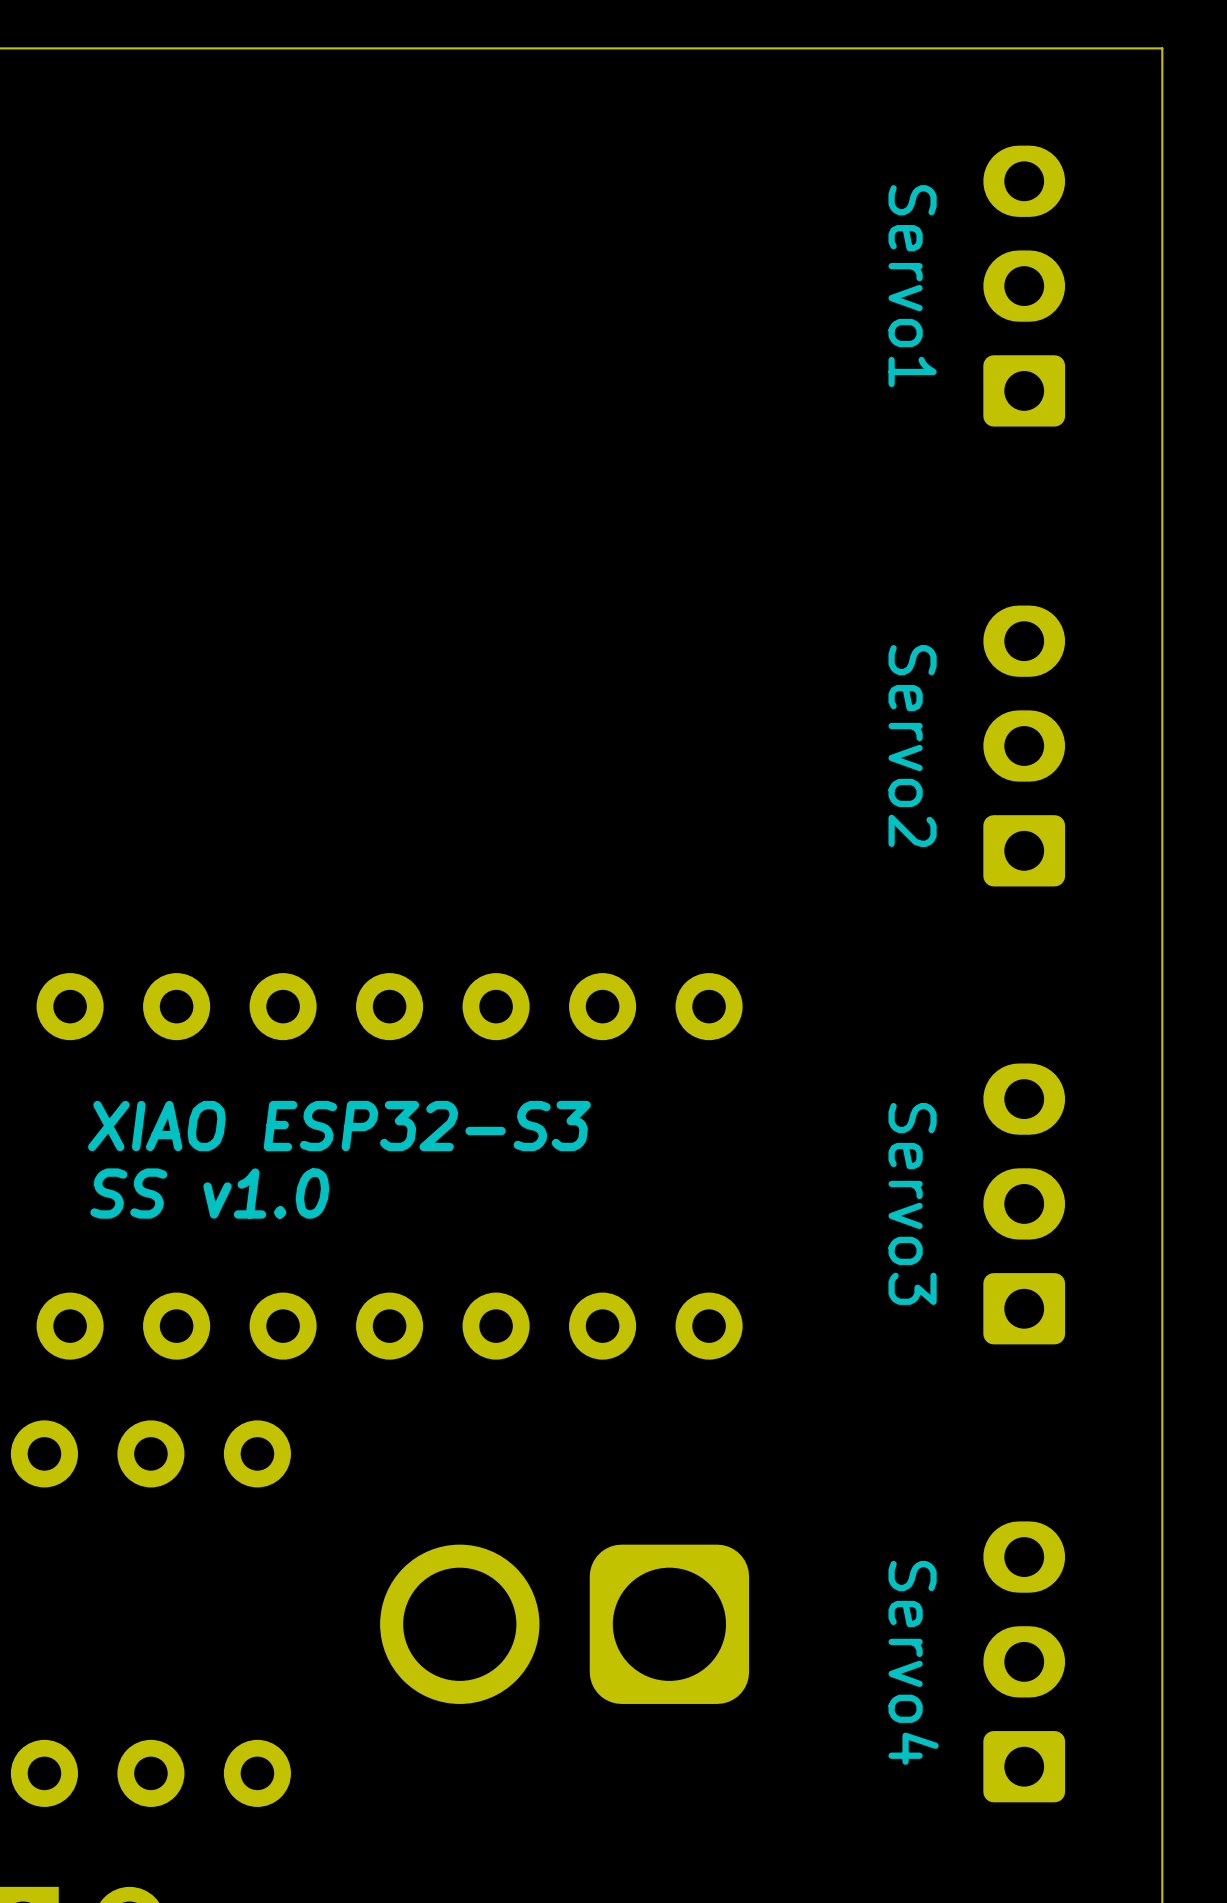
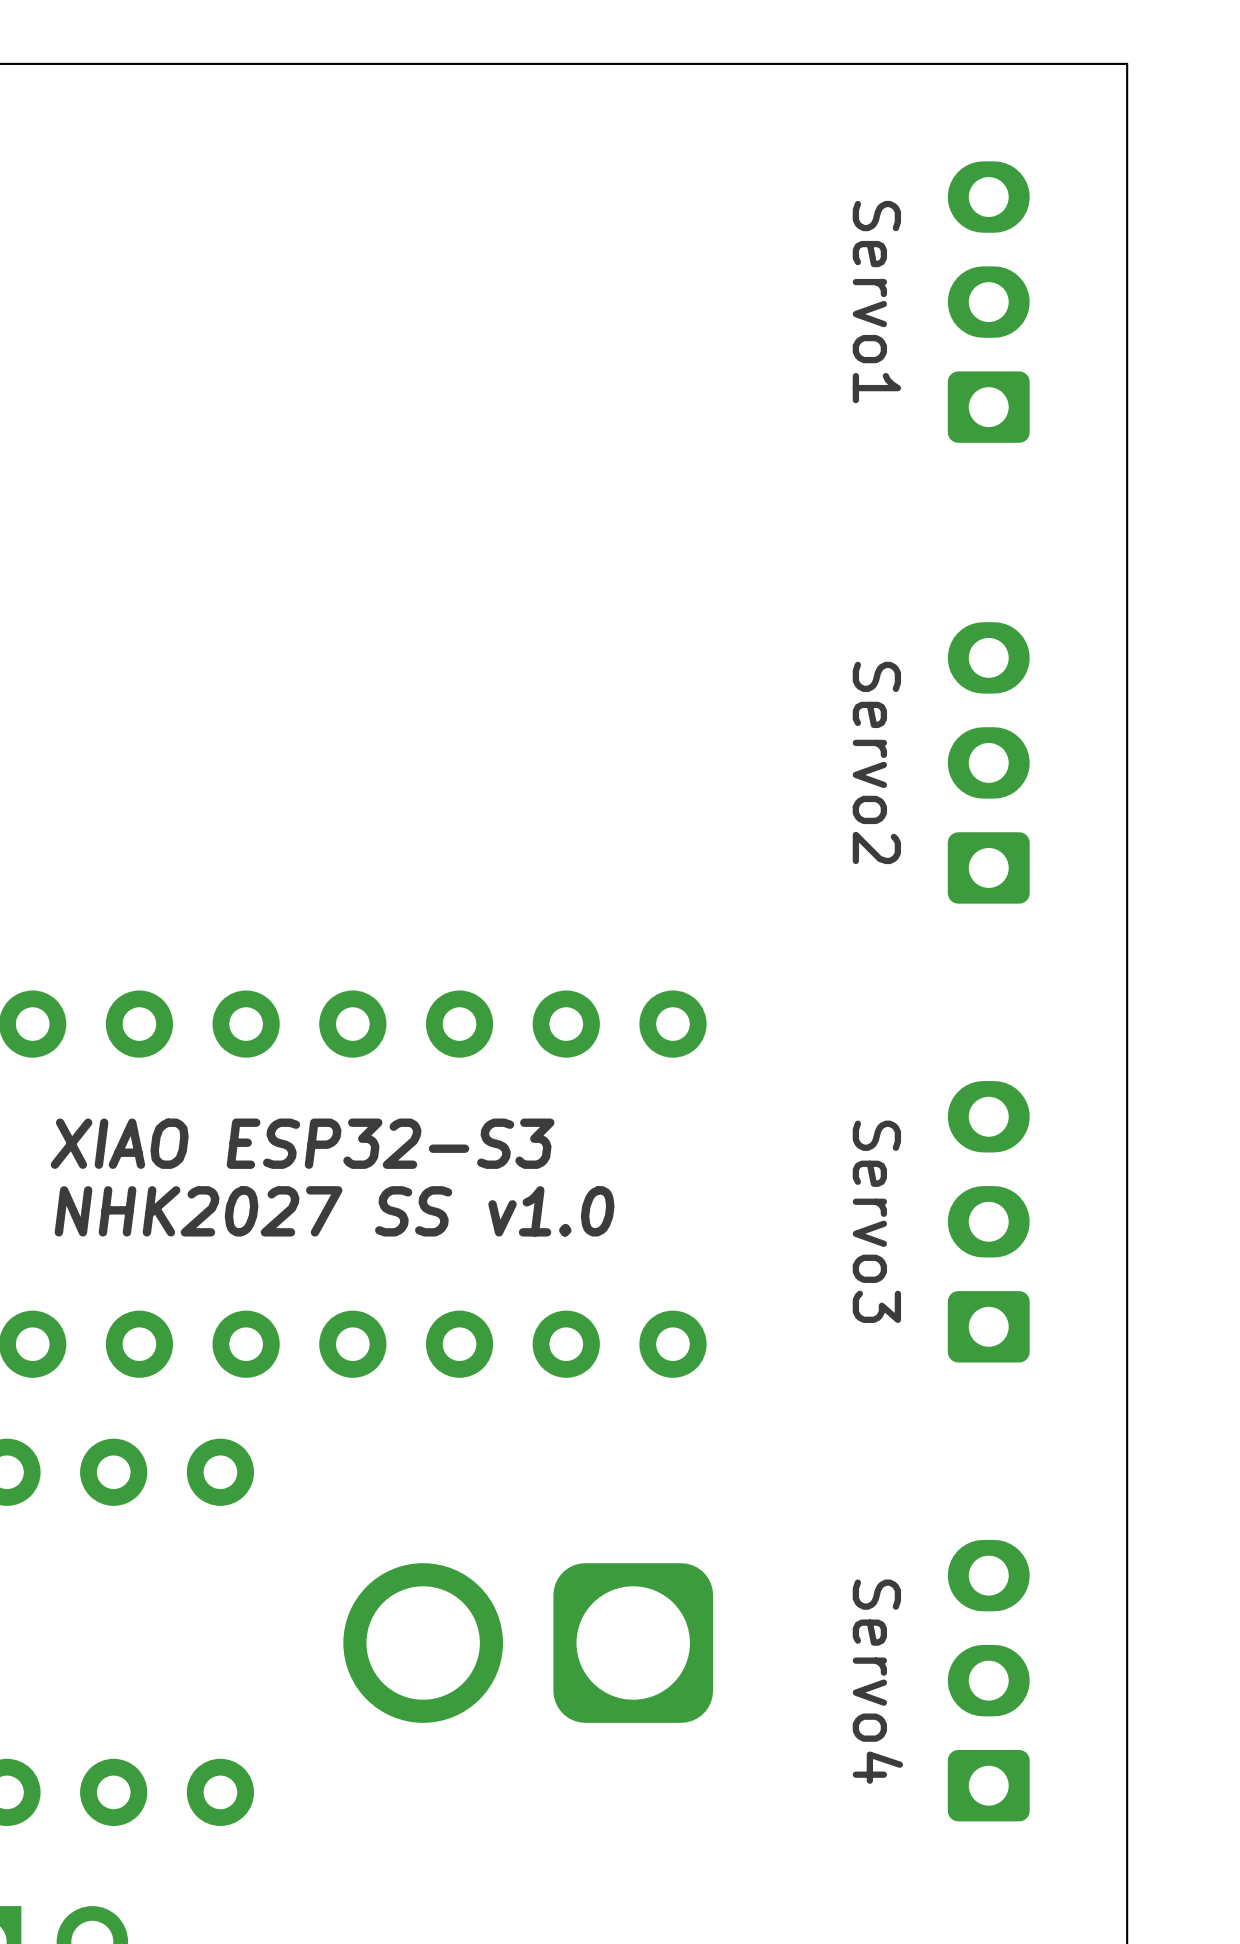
text: SS v1.0 (209, 1193) -> NHK2027 SS v1.0 (334, 1211)

